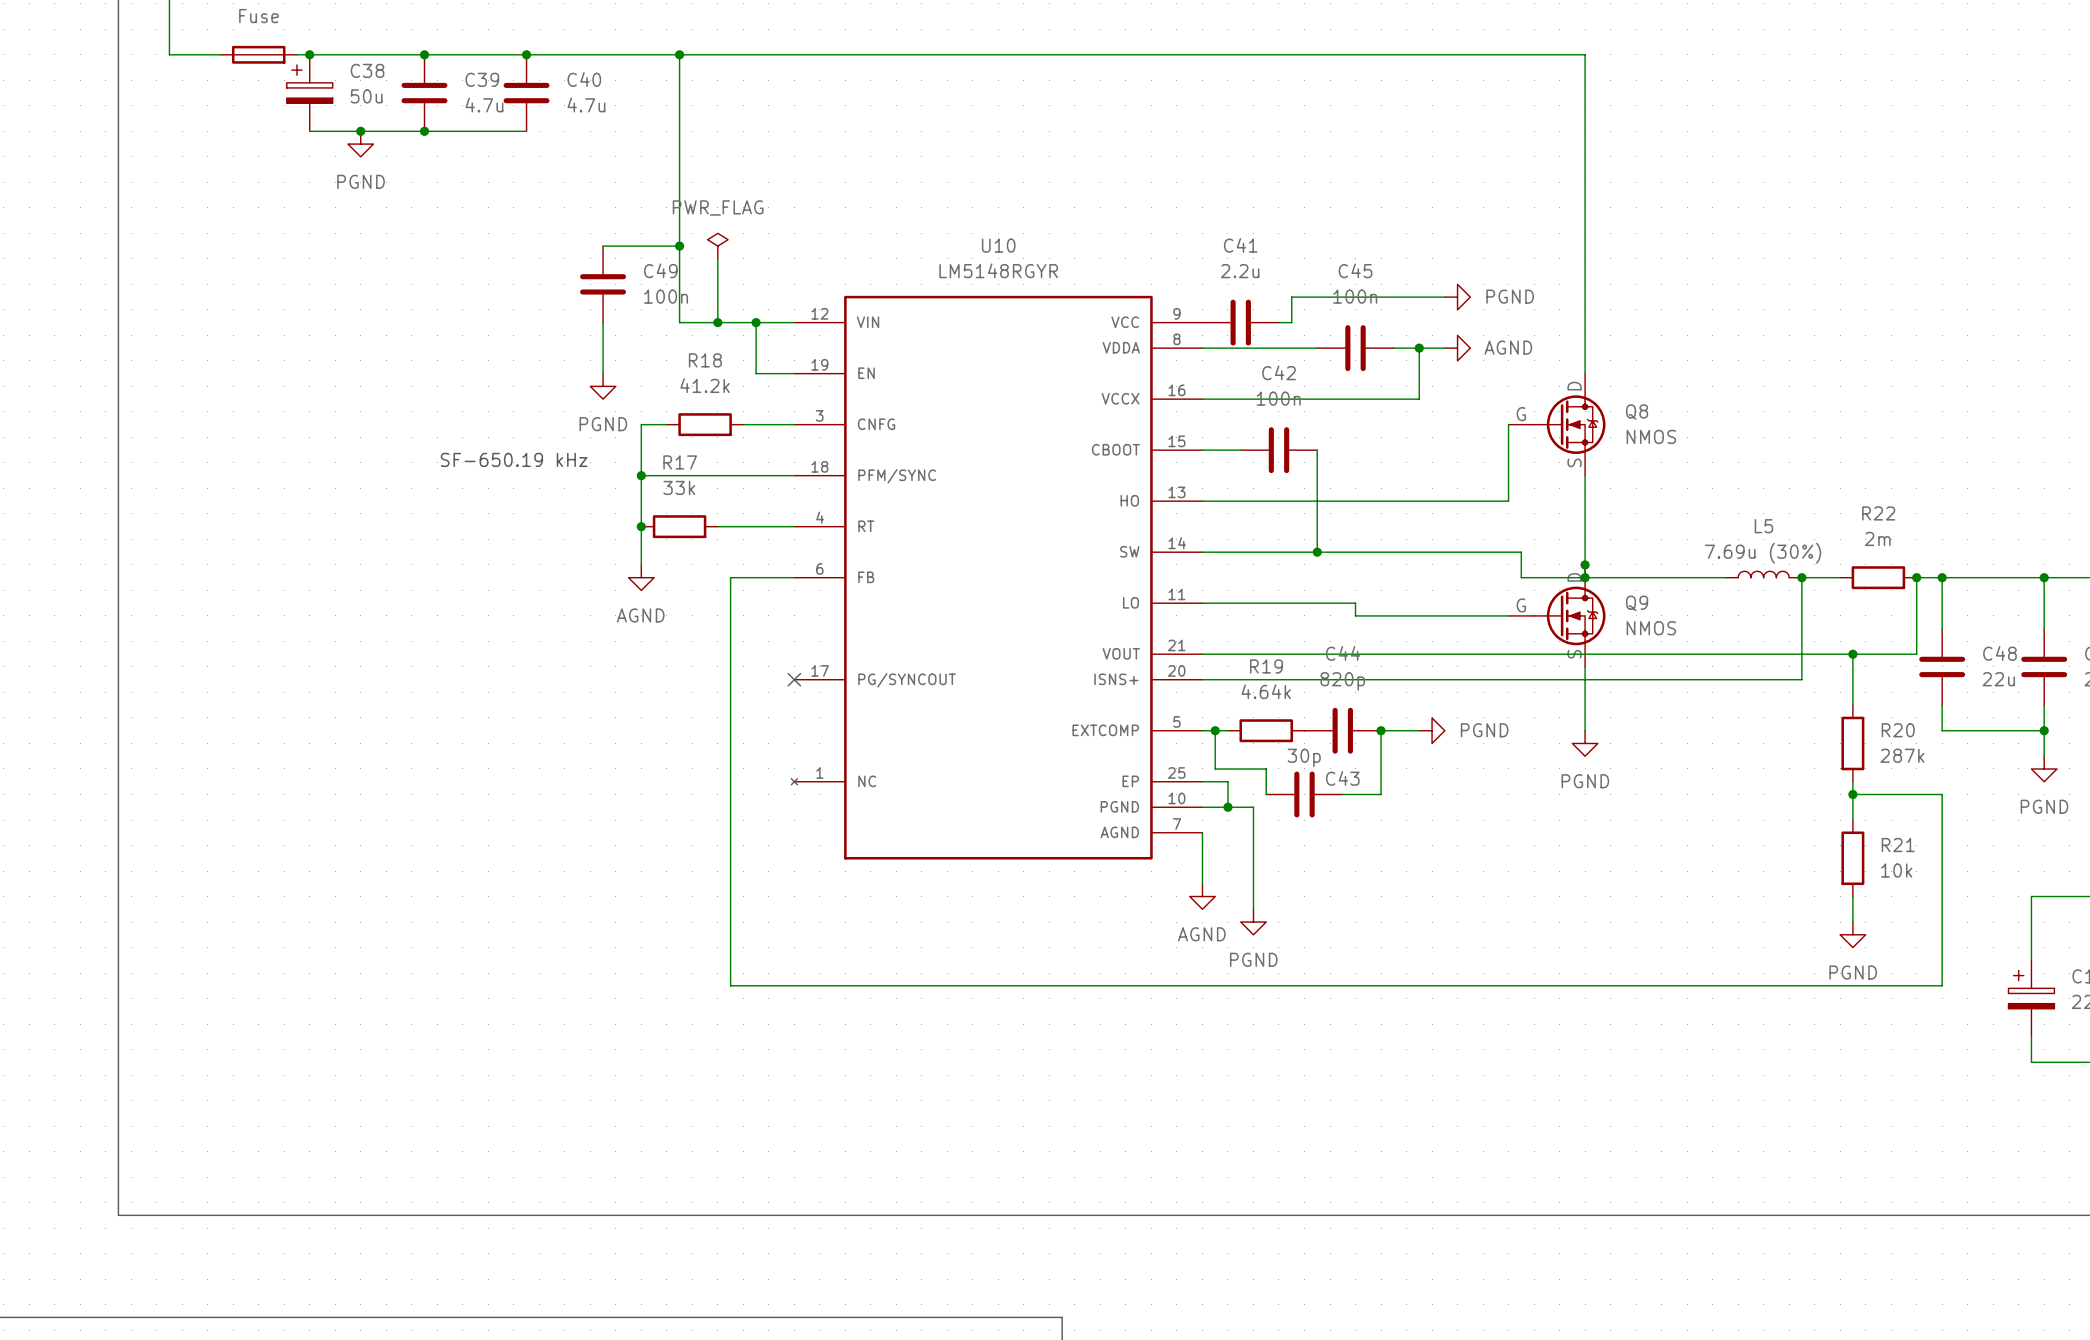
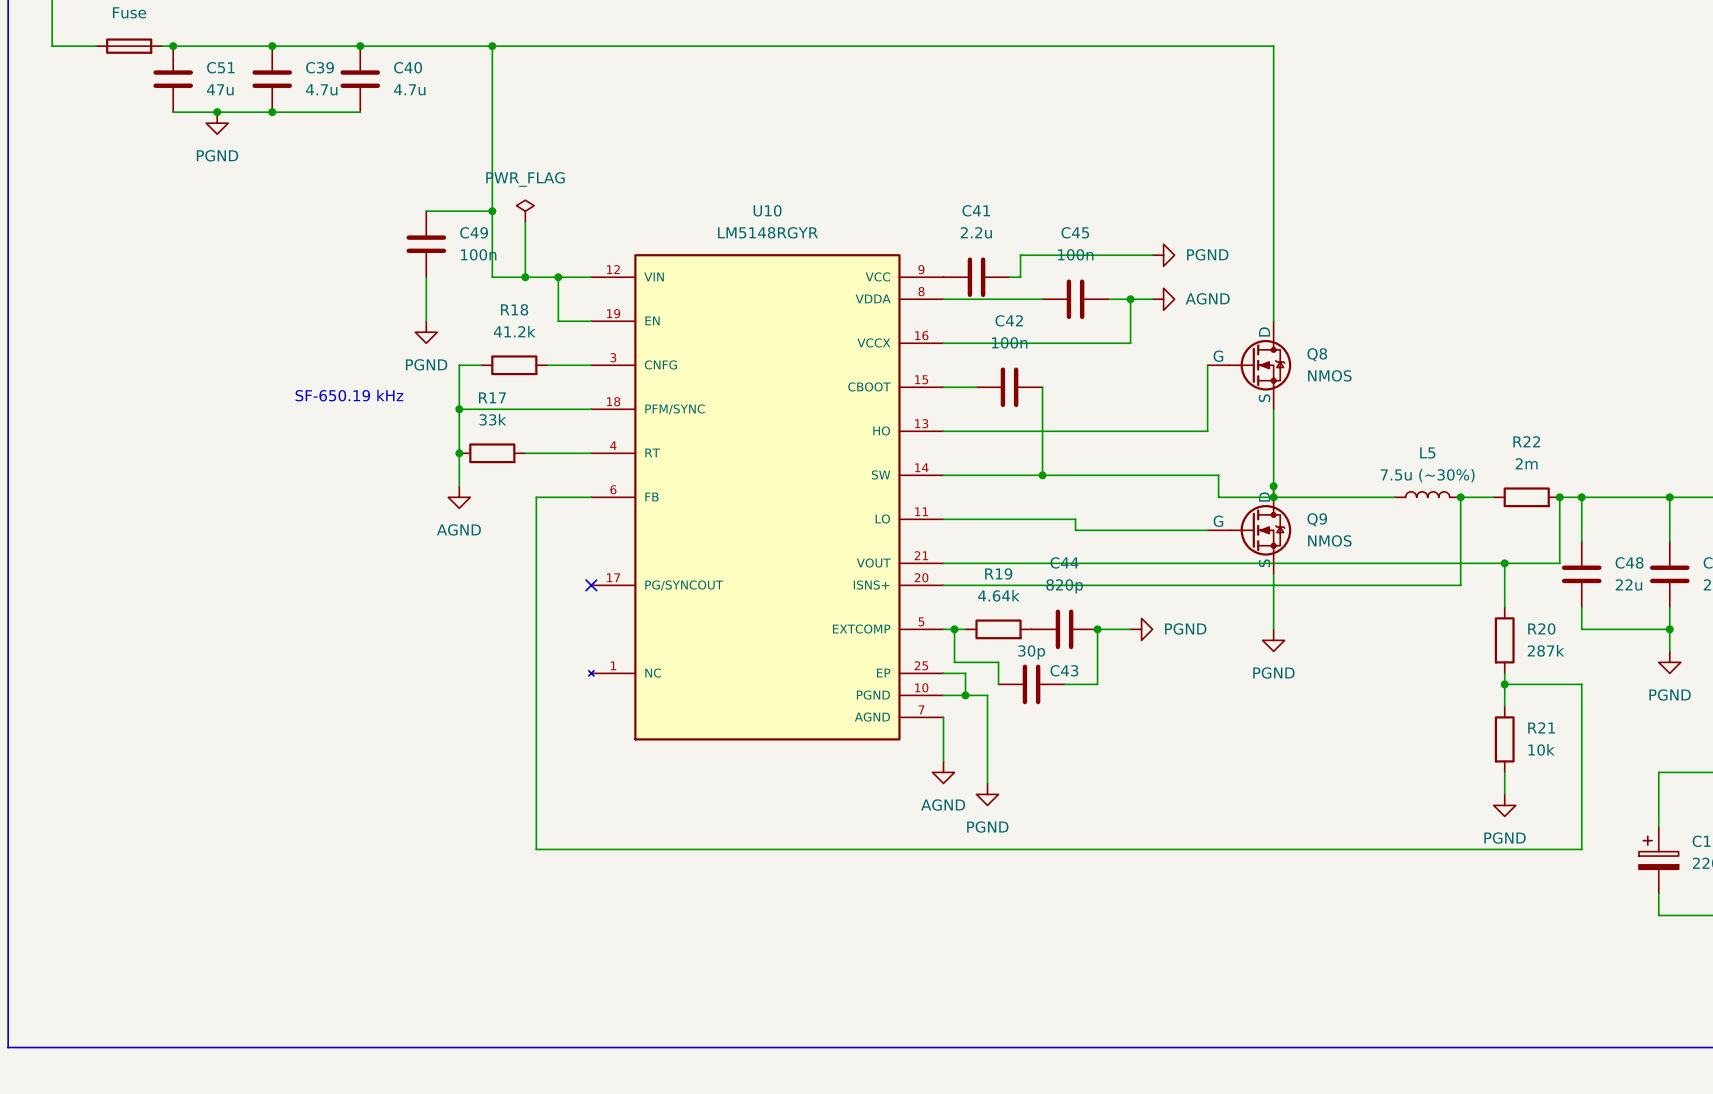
C38: 50u (309, 93) -> none
C51: none -> 47u (173, 79)
L5 value: 7.69u (30%) (1763, 553) -> 7.5u (~30%) (1427, 475)

